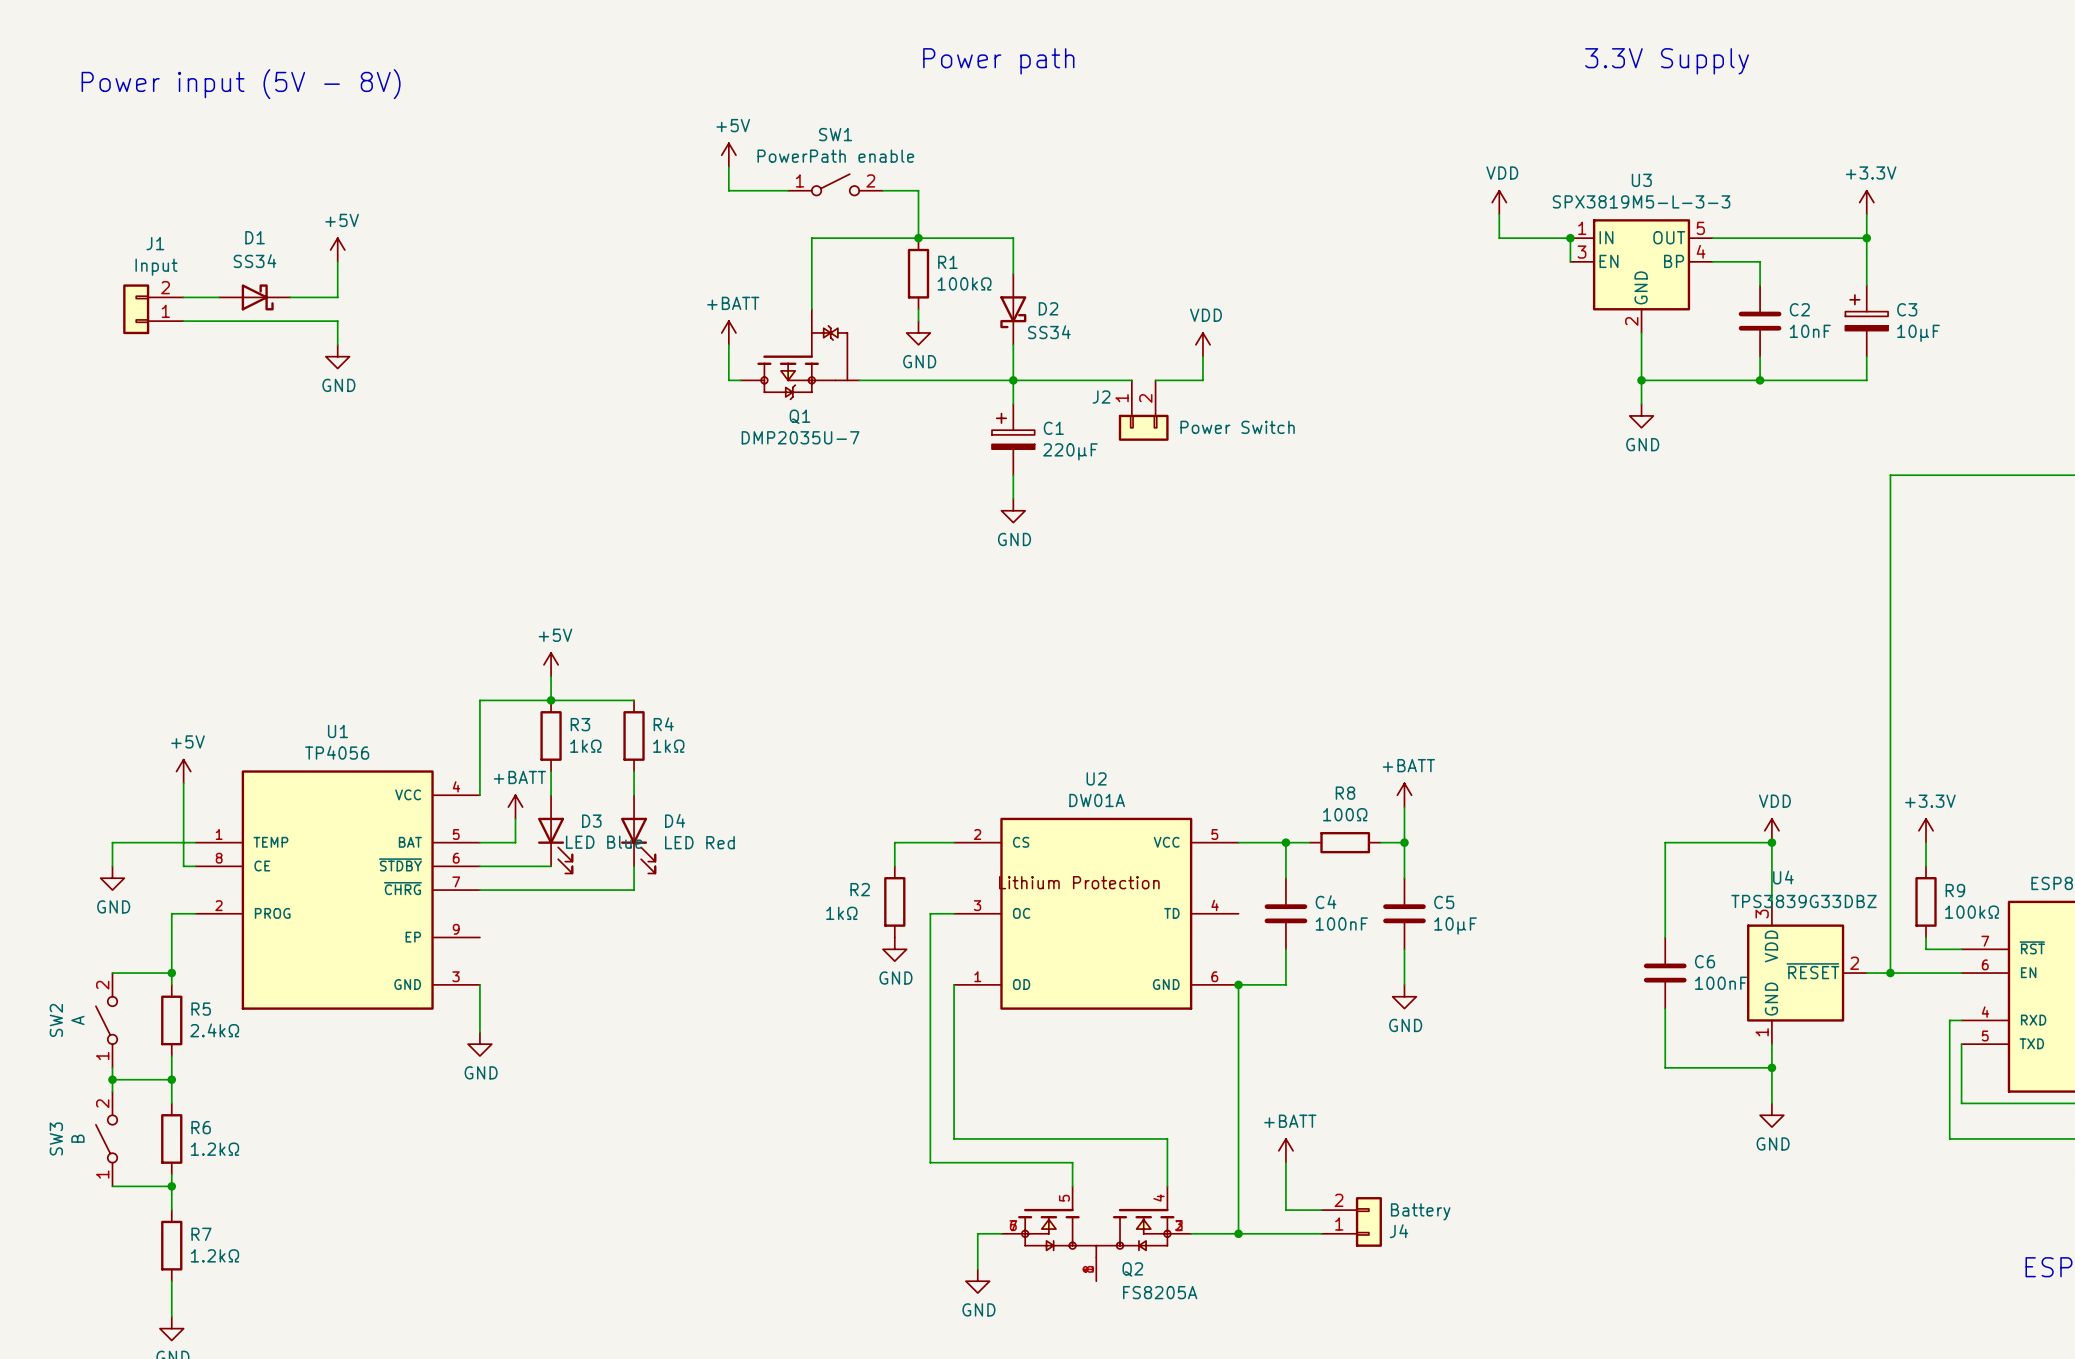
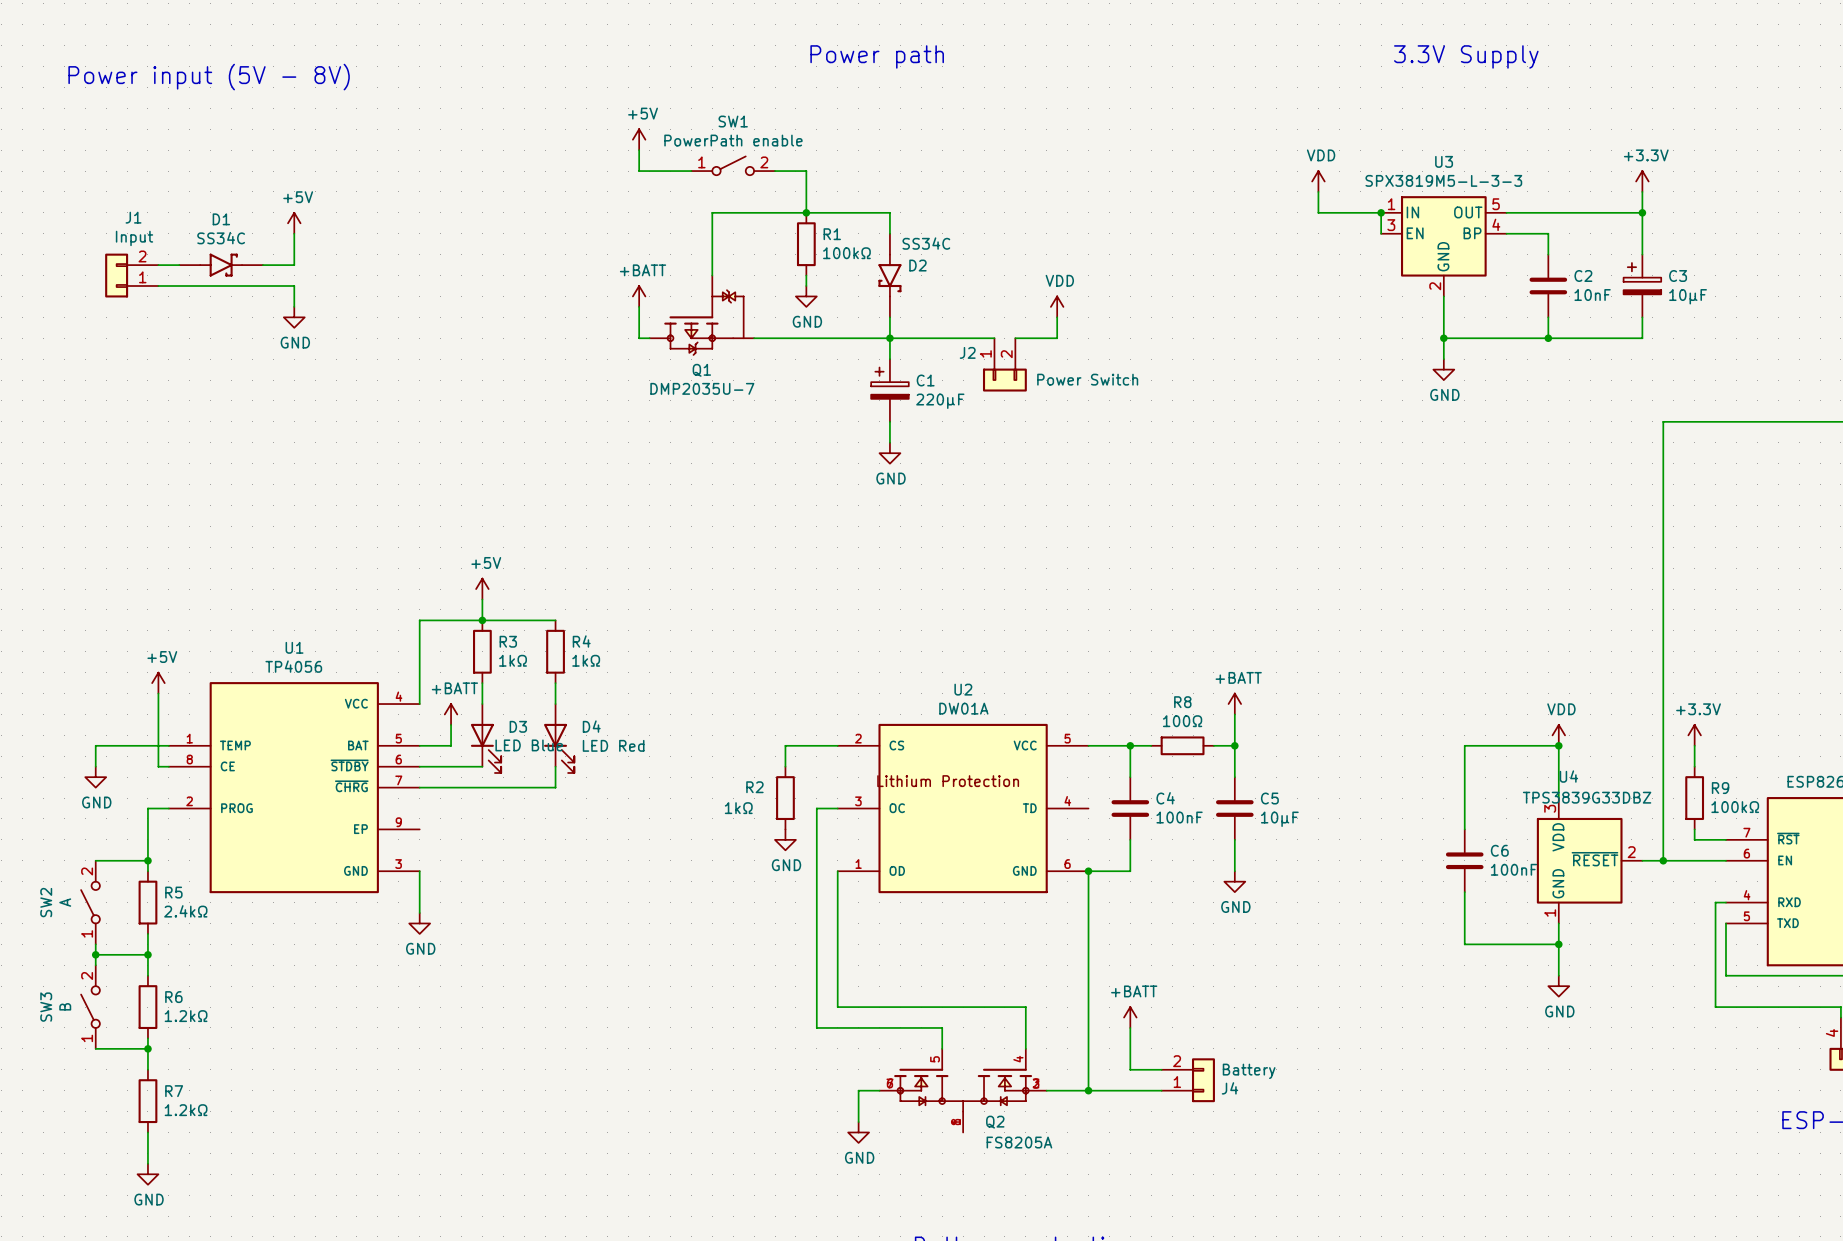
D1 value: SS34 (255, 261) -> SS34C (221, 238)
D2 symbol: [1000, 273, 1027, 345] -> [878, 233, 902, 318]
D1 symbol: [219, 284, 291, 311] -> [179, 253, 263, 277]
D2 value: SS34 (1049, 332) -> SS34C (926, 243)

